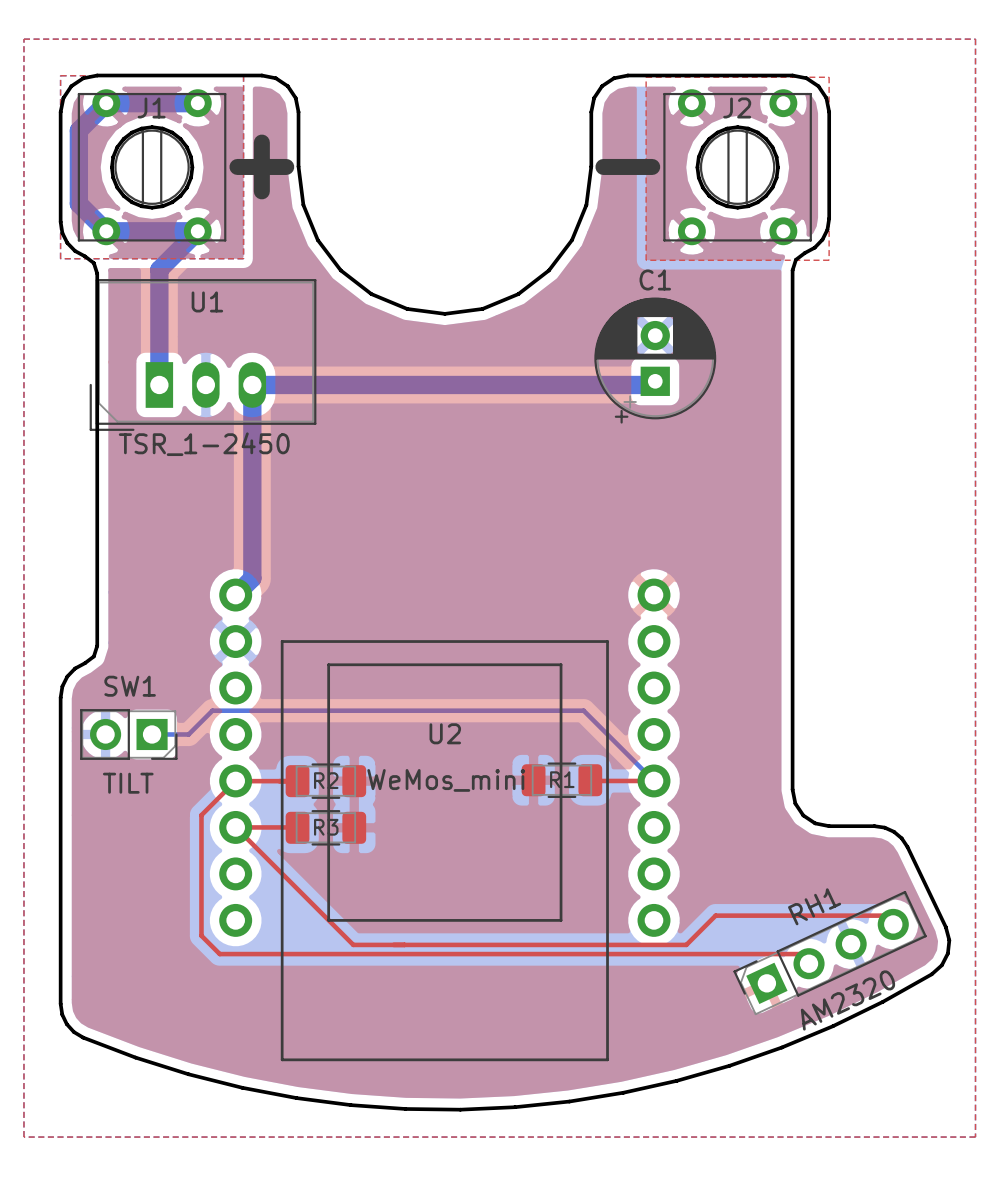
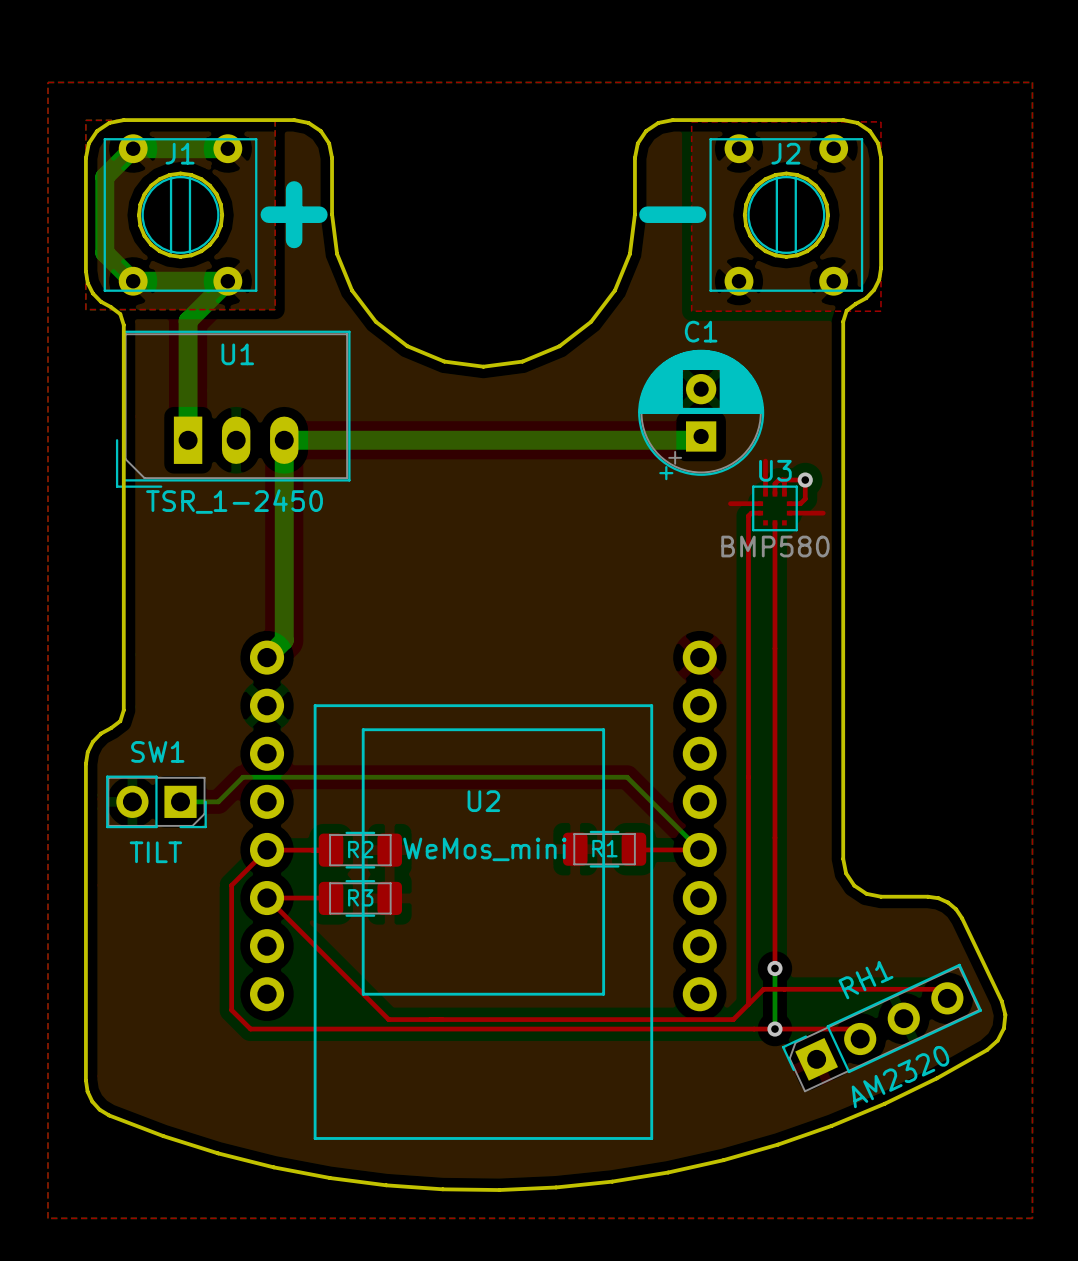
top track: none -> (765, 461) (765, 493)
top track: none -> (782, 480) (784, 481) (784, 493)
via: none -> (805, 480)
top track: none -> (774, 493) (774, 483) (778, 480) (805, 480) (805, 498) (800, 503) (789, 503)
top track: none -> (730, 503) (760, 503)
U3: none -> BMP580 (774, 508)
top track: none -> (760, 513) (751, 513) (748, 515) (748, 1004)
top track: none -> (789, 513) (823, 513)
top track: none -> (774, 522) (774, 968)
bottom track: none -> (774, 968) (774, 1029)
via: none -> (774, 968)
via: none -> (774, 1029)

